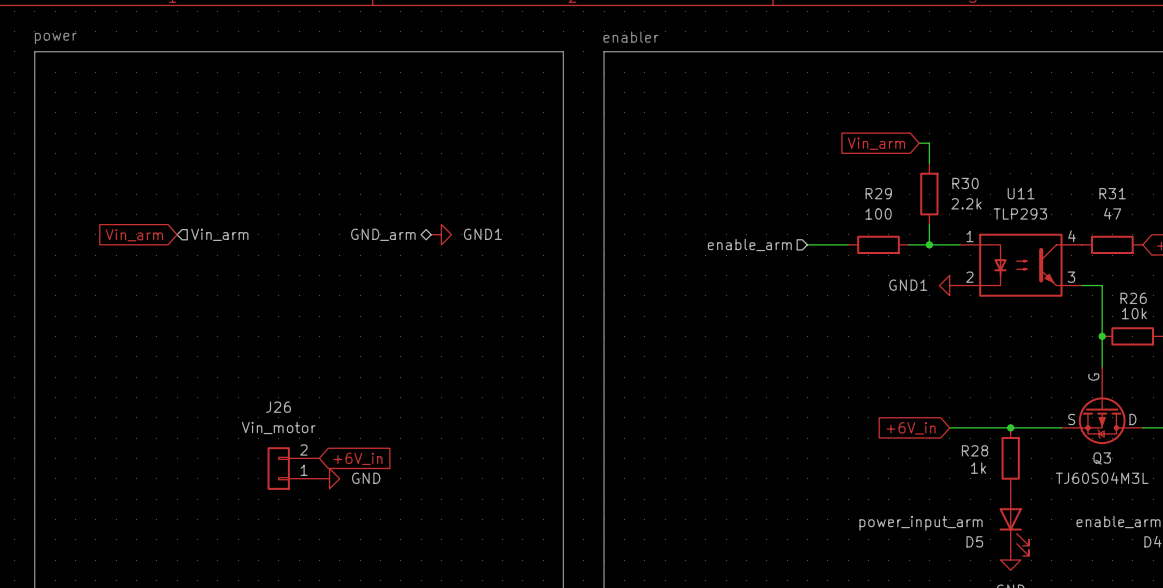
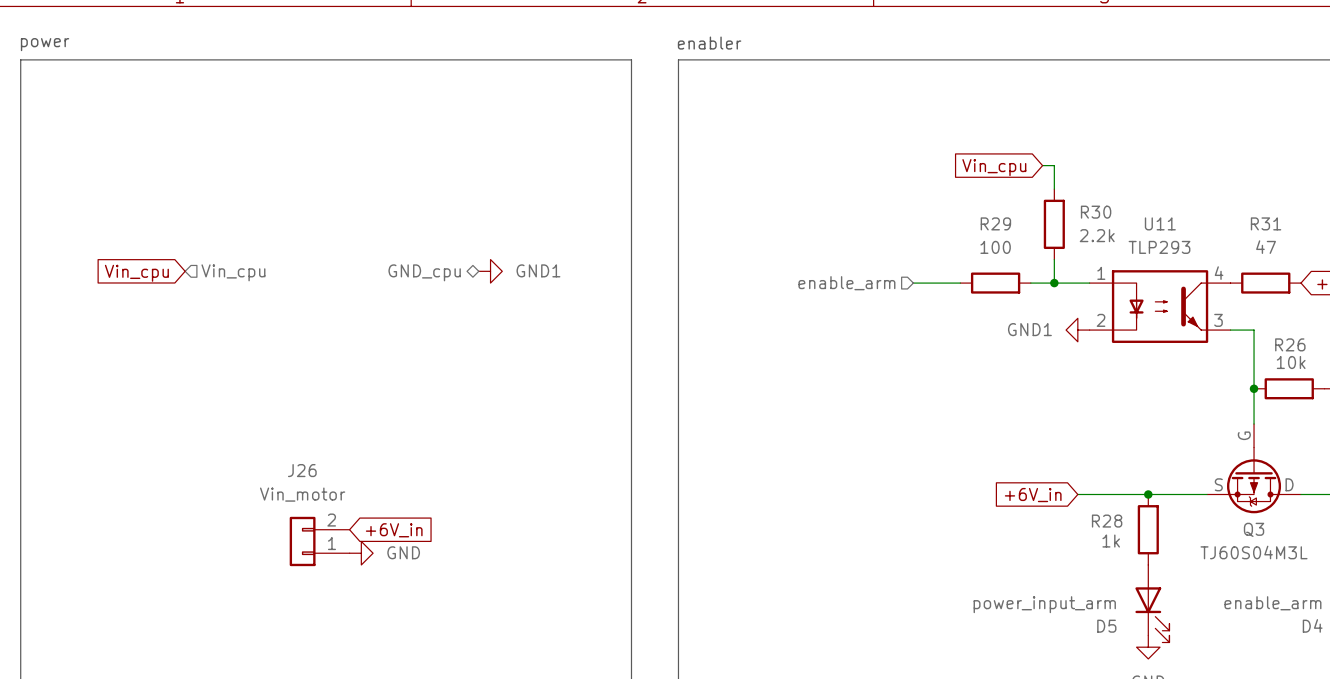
global label: Vin_arm (876, 143) -> Vin_cpu (994, 167)
hierarchical label: Vin_arm (219, 234) -> Vin_cpu (233, 272)
hierarchical label: GND_arm (383, 234) -> GND_cpu (424, 272)
global label: Vin_arm (134, 235) -> Vin_cpu (136, 273)

